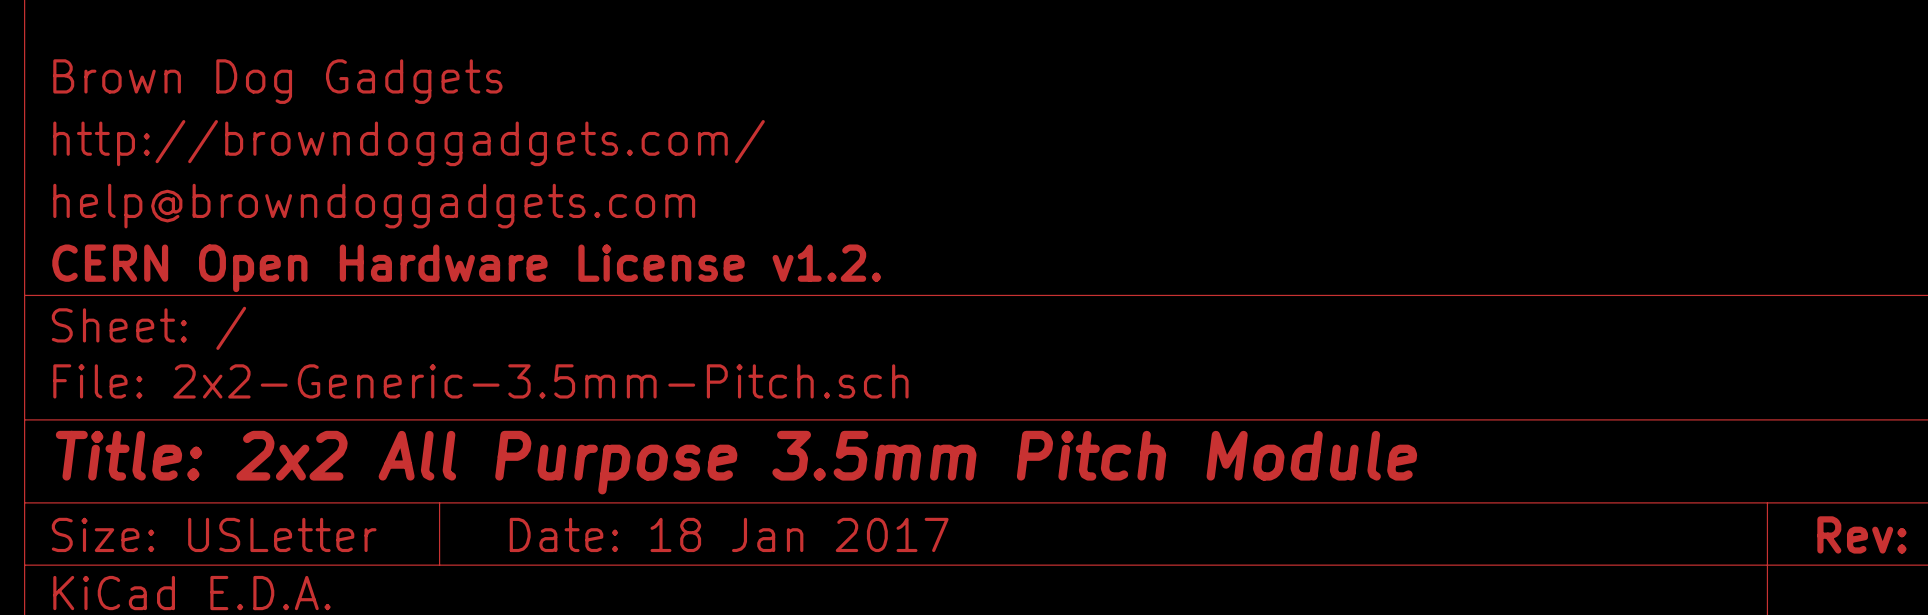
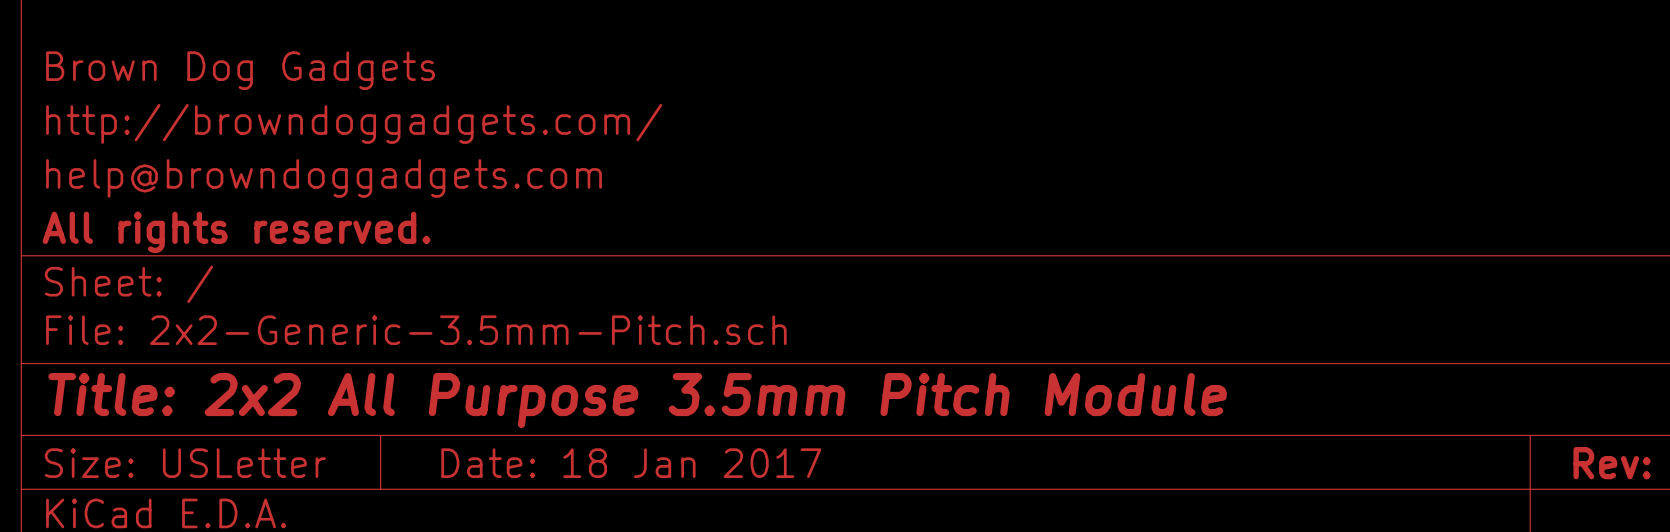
title block: CERN Open Hardware License v1.2. (466, 268) -> All rights reserved. (236, 232)

